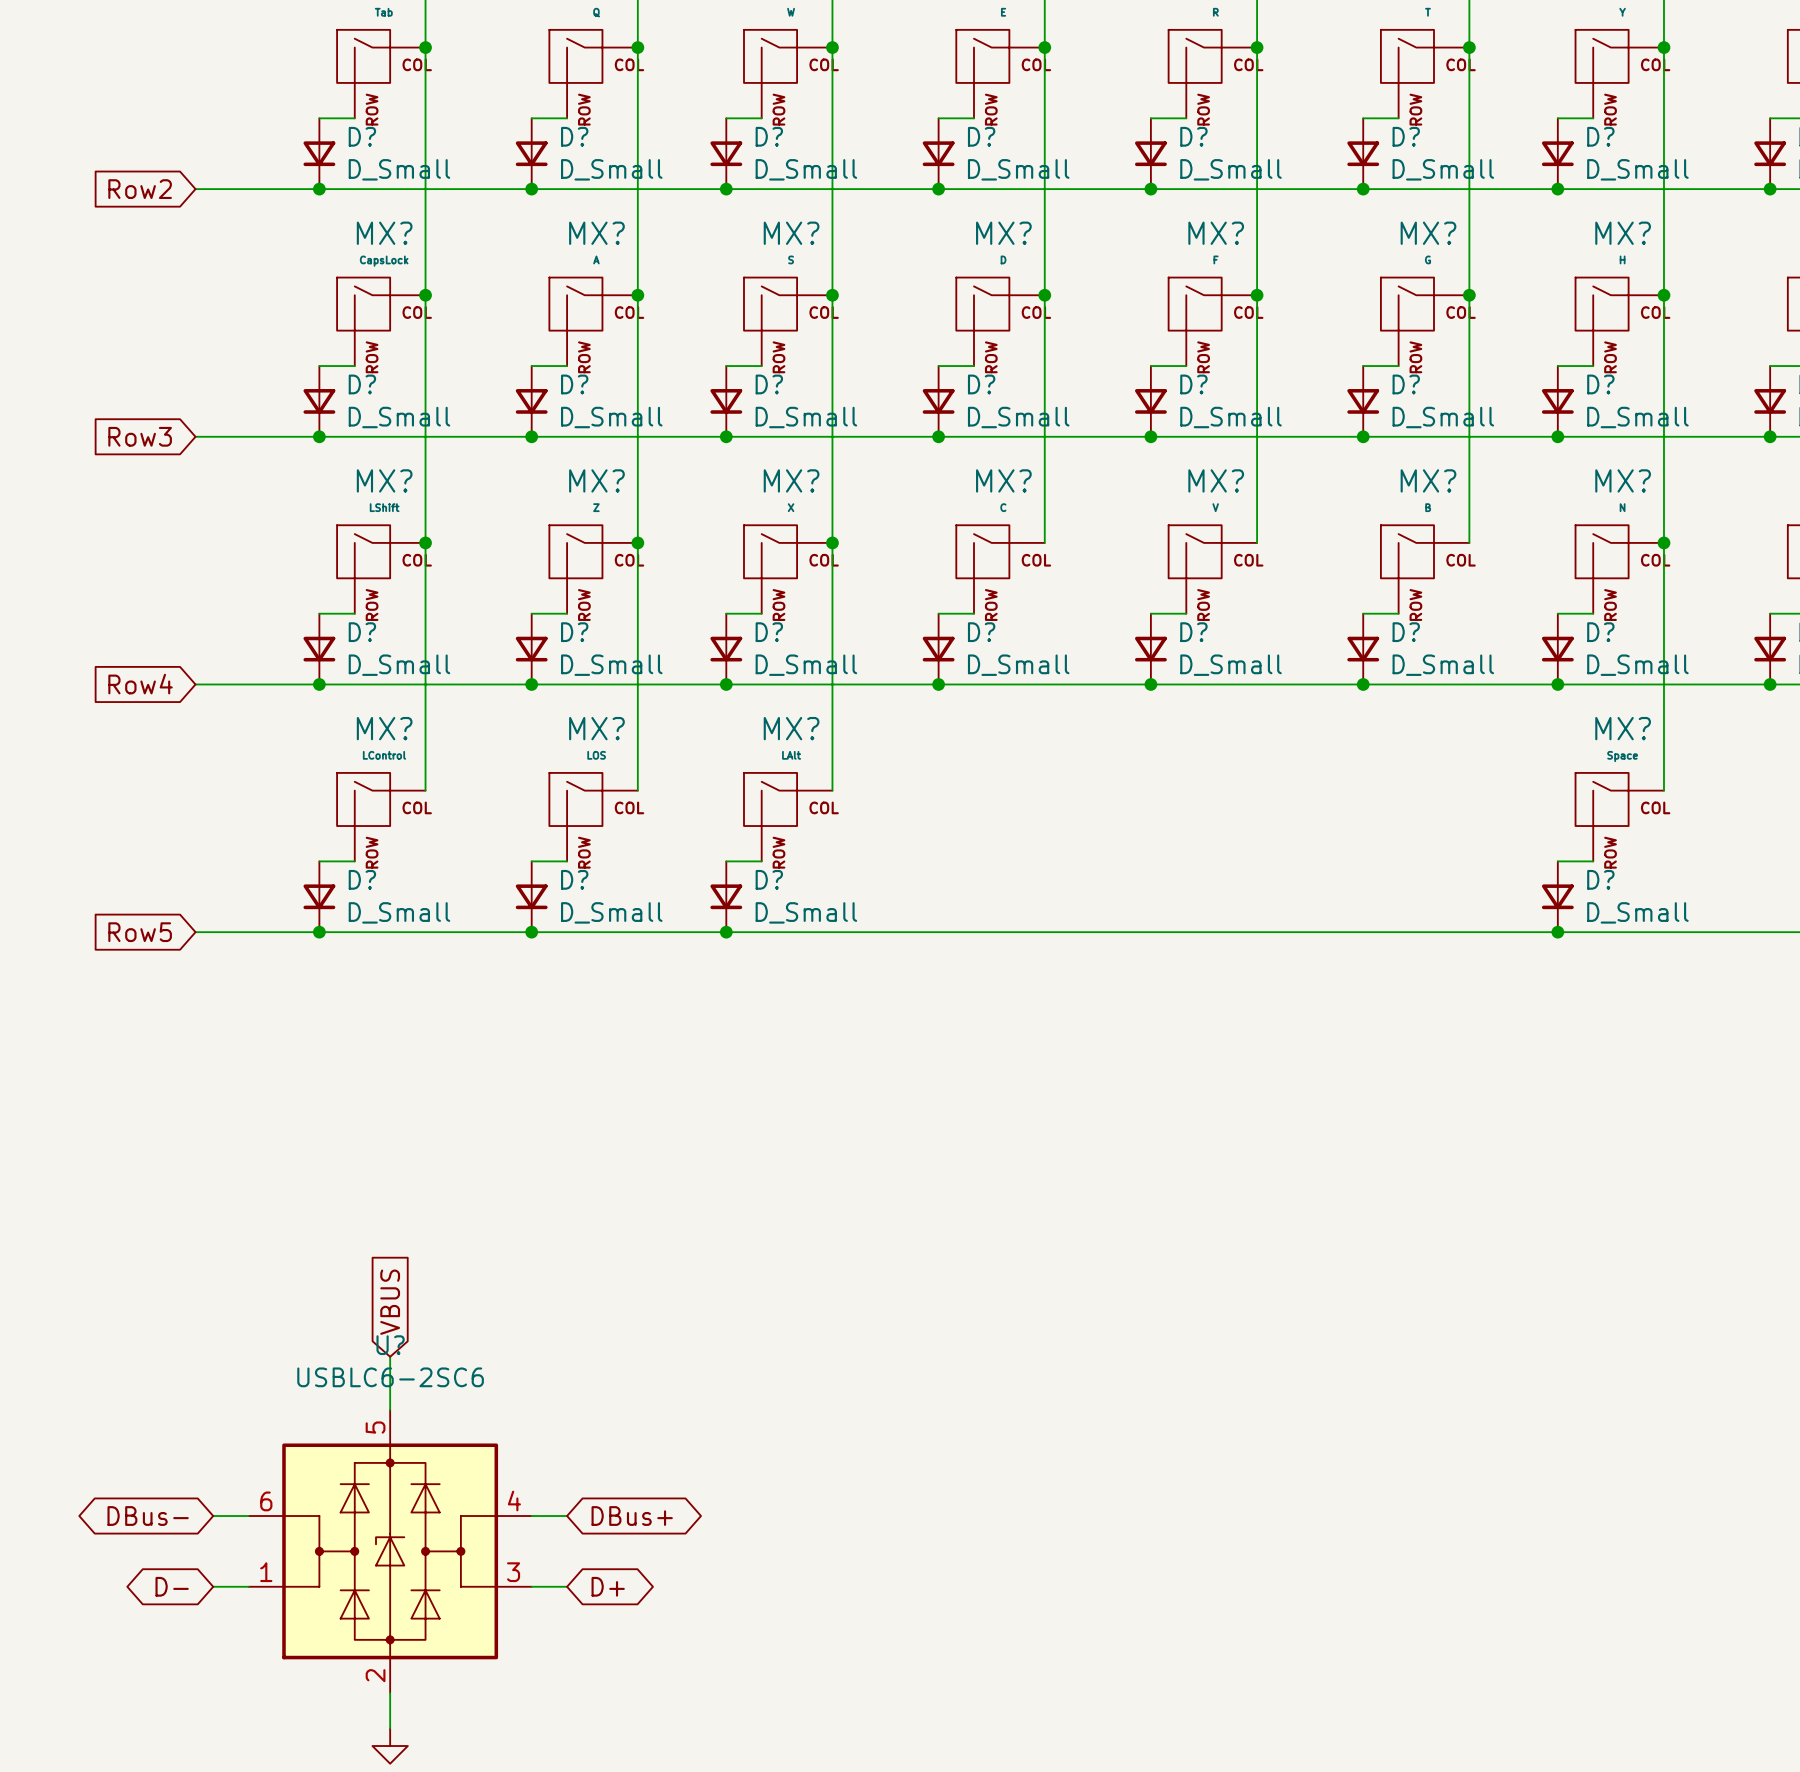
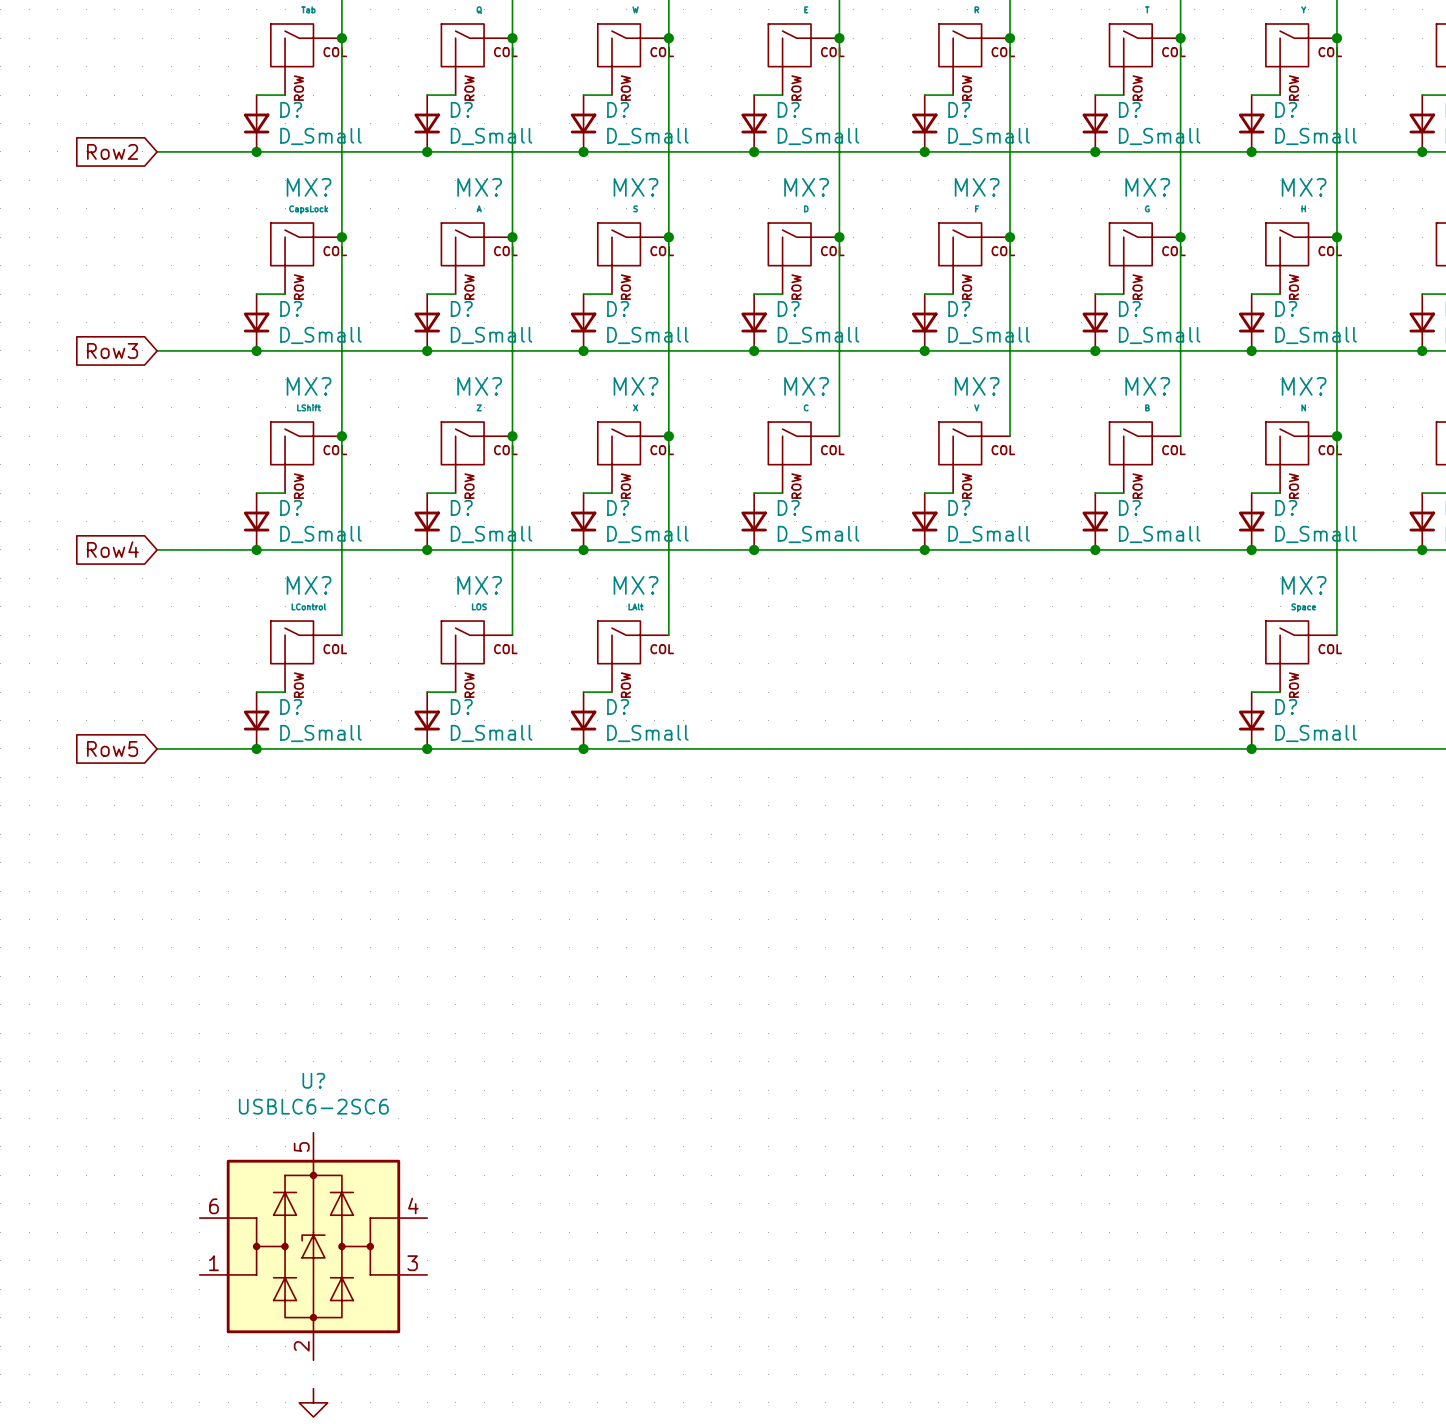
global label: VBUS (390, 1302) -> none
wire: (390, 1356) (390, 1409) -> none
global label: DBus- (148, 1516) -> none
wire: (213, 1516) (248, 1516) -> none
wire: (531, 1516) (567, 1516) -> none
global label: DBus+ (632, 1516) -> none
global label: D- (172, 1586) -> none
wire: (213, 1586) (248, 1586) -> none
wire: (531, 1586) (567, 1586) -> none
global label: D+ (608, 1586) -> none
wire: (390, 1692) (390, 1728) -> none

